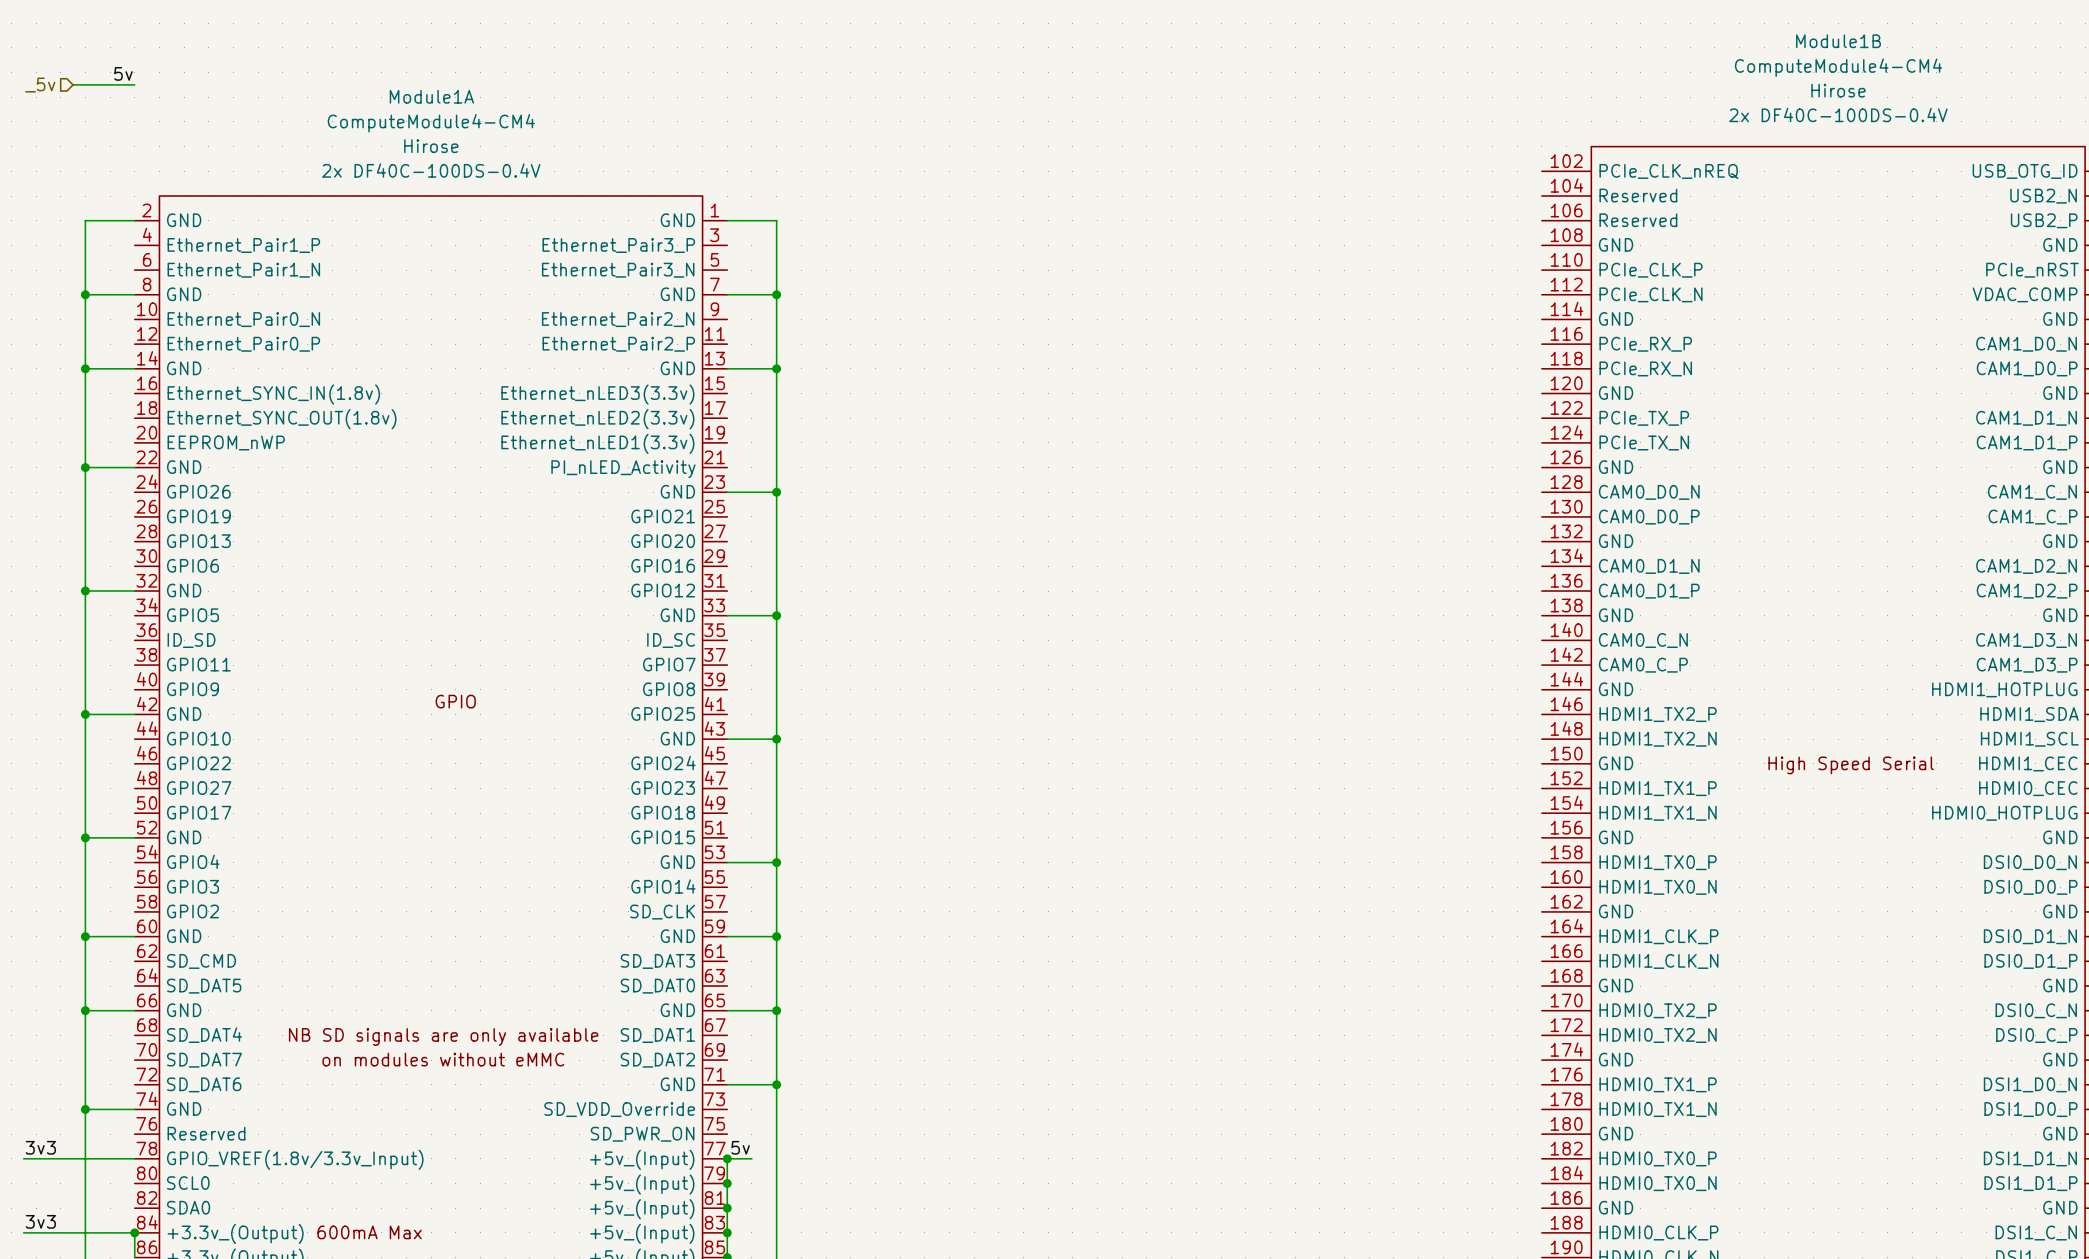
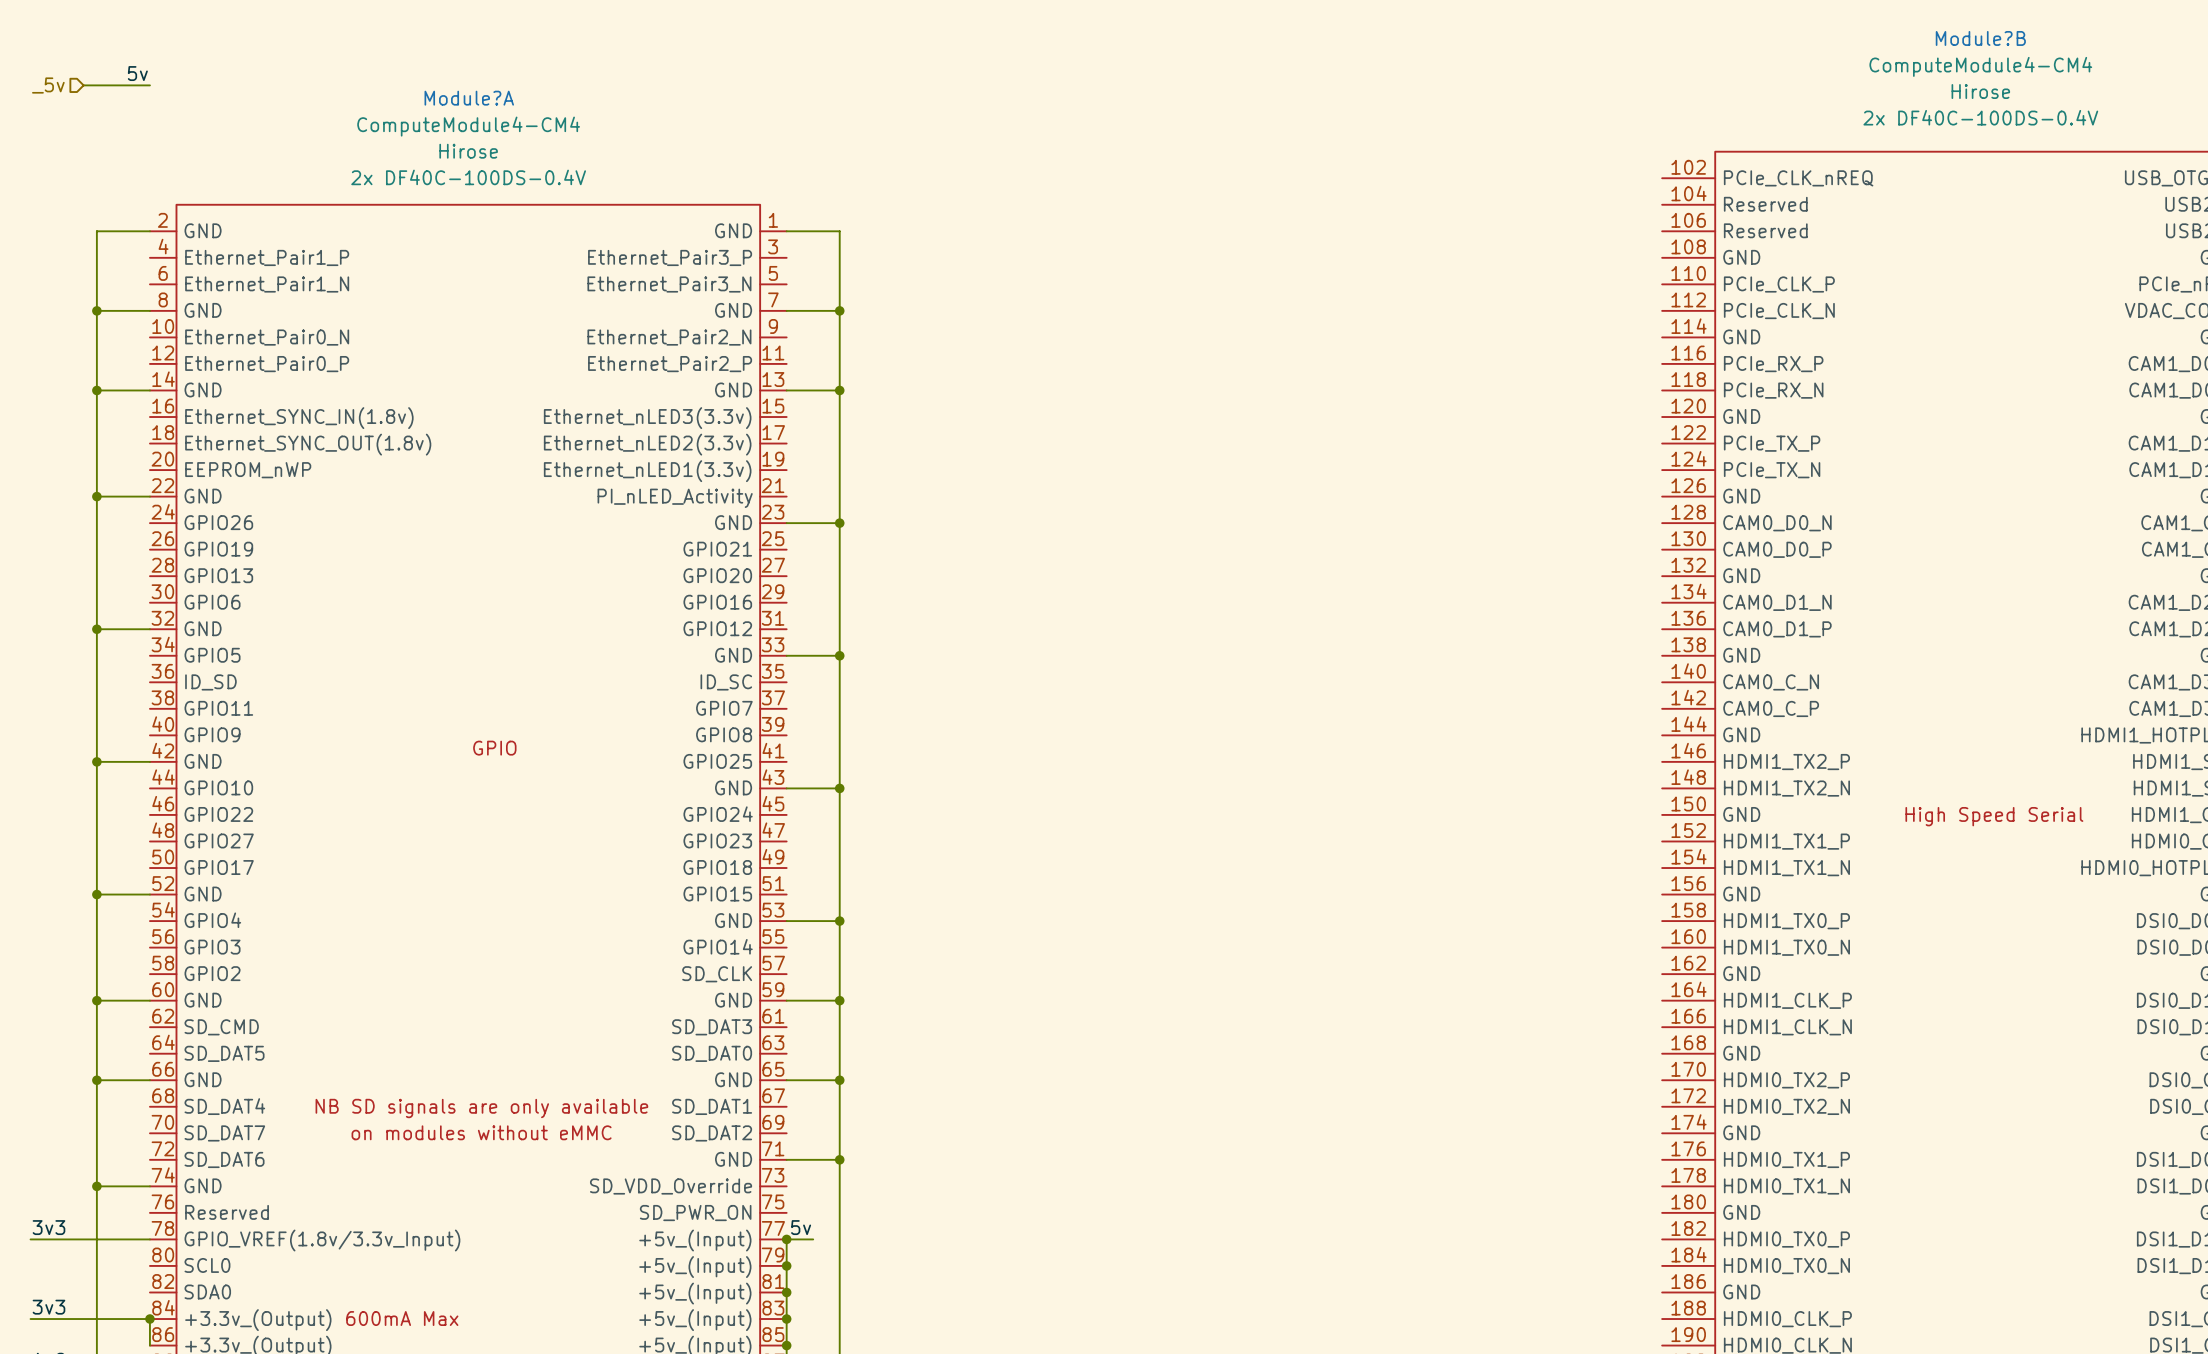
Module1B name: Module1B (1838, 41) -> Module?B (1980, 38)
Module1A name: Module1A (431, 96) -> Module?A (469, 98)

